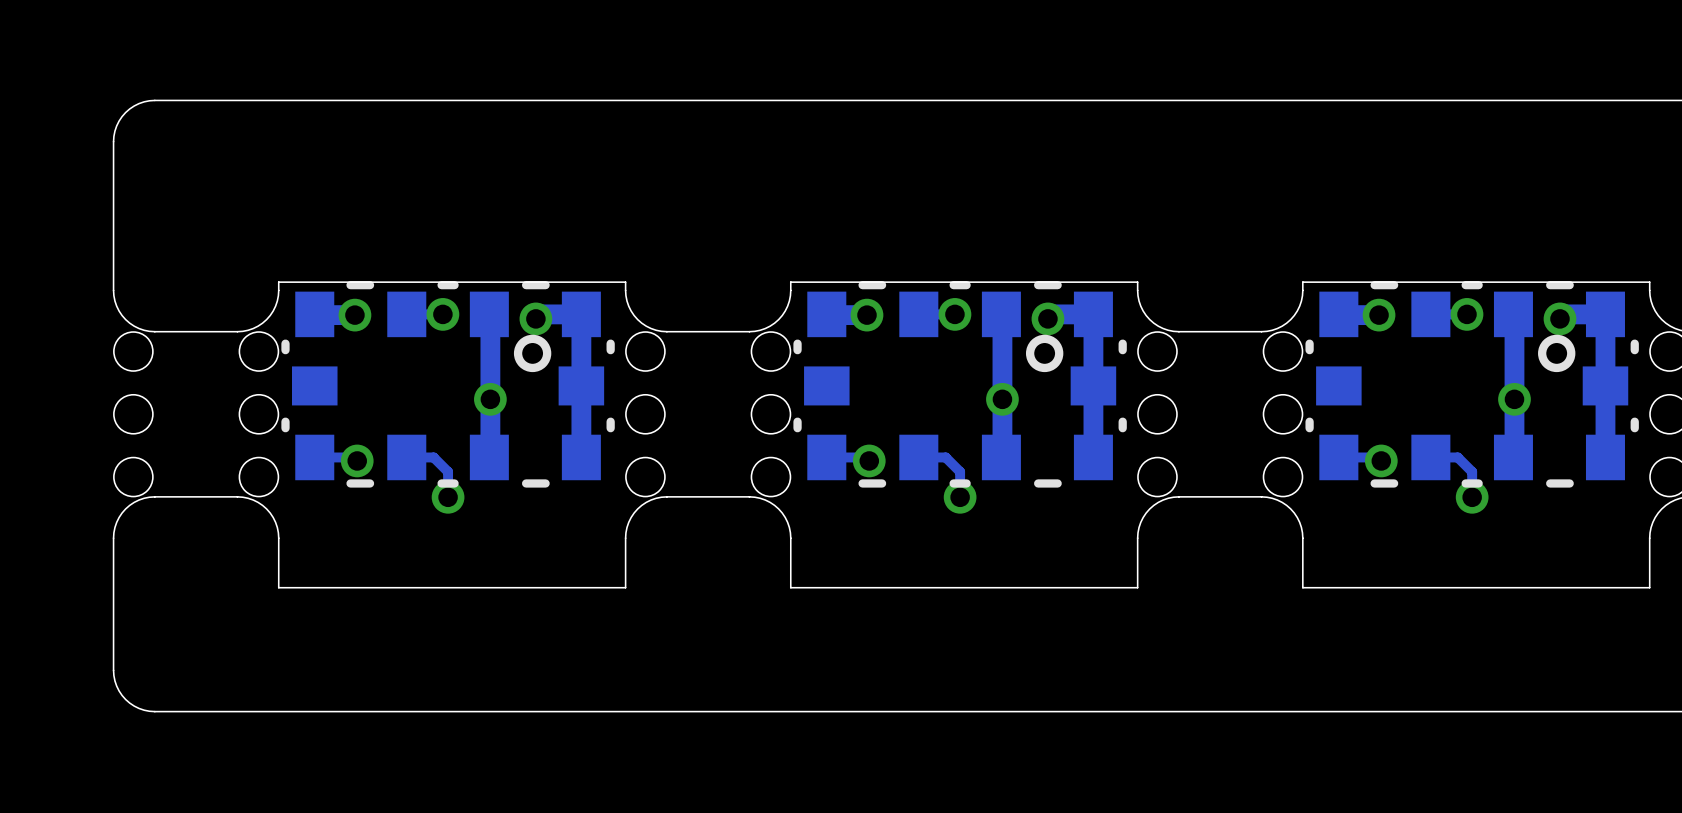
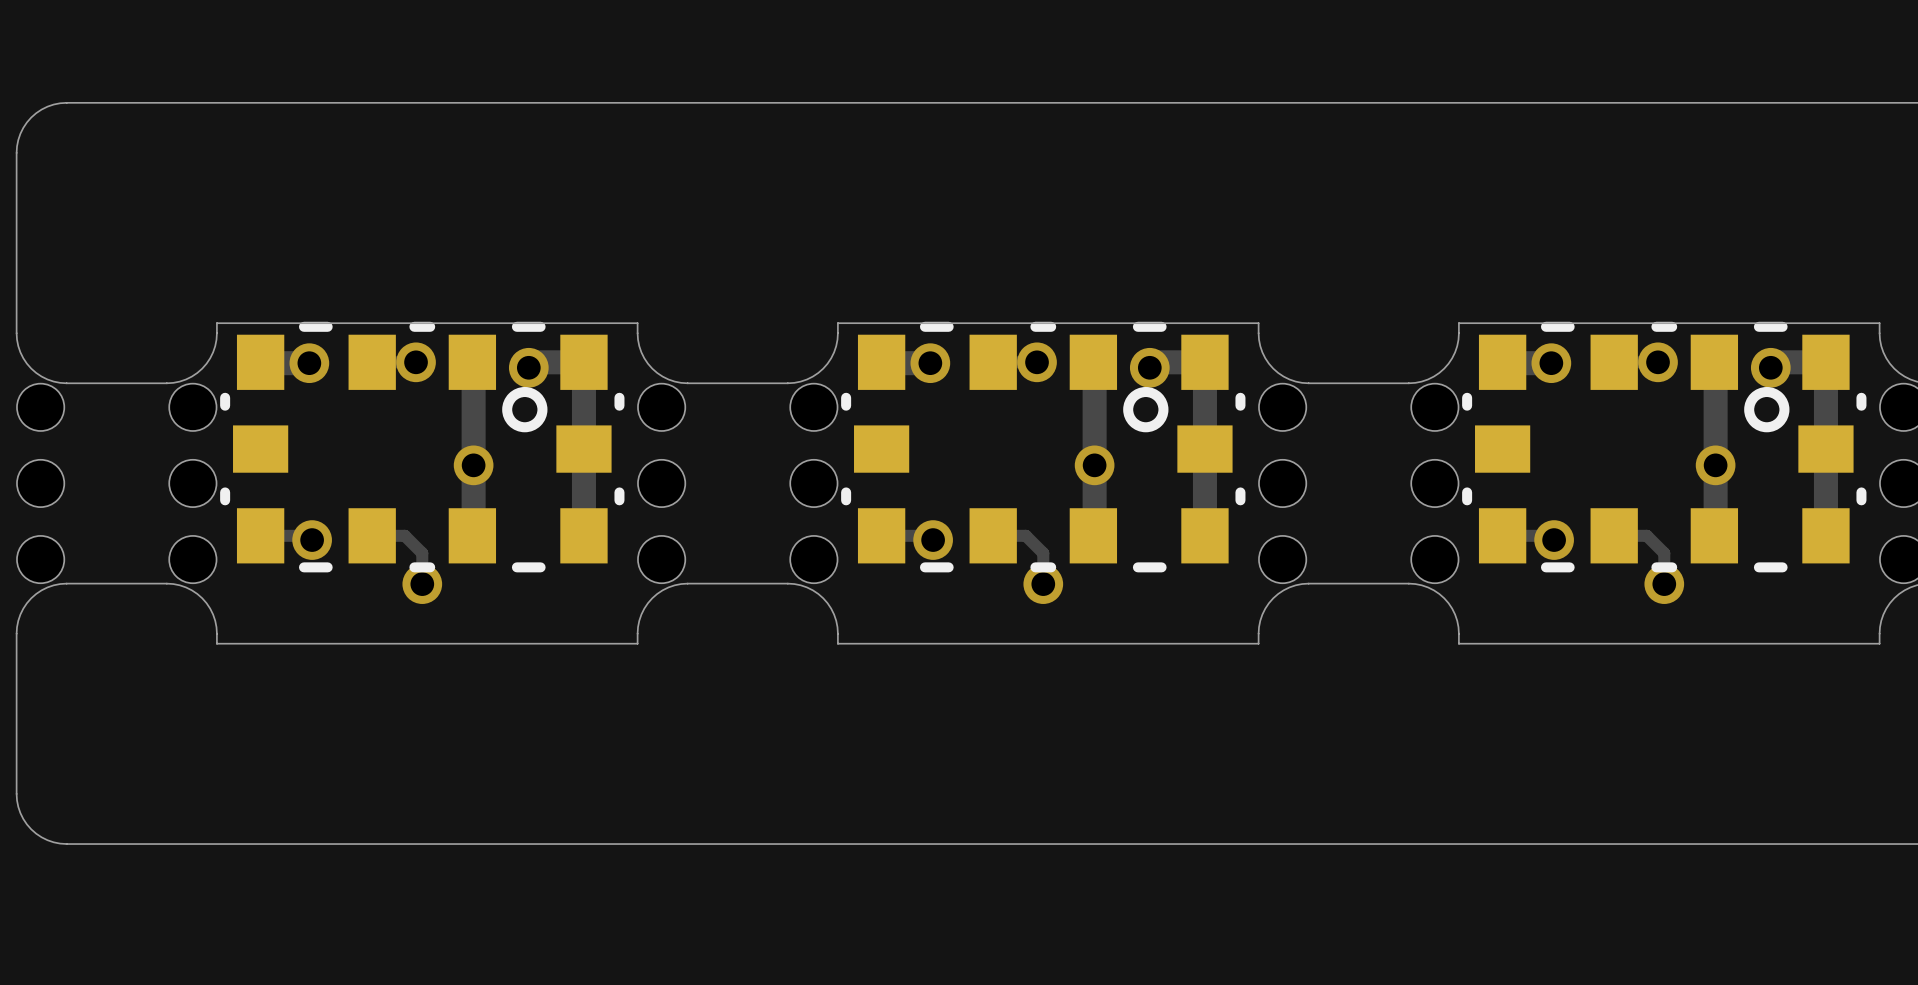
board edge: (625, 546) (625, 587) (278, 587) (278, 546) -> (637, 643) (216, 643)
board edge: (1137, 546) (1137, 587) (790, 587) (790, 546) -> (1258, 643) (837, 643)
board edge: (1649, 546) (1649, 587) (1302, 587) (1302, 546) -> (1879, 643) (1458, 643)

